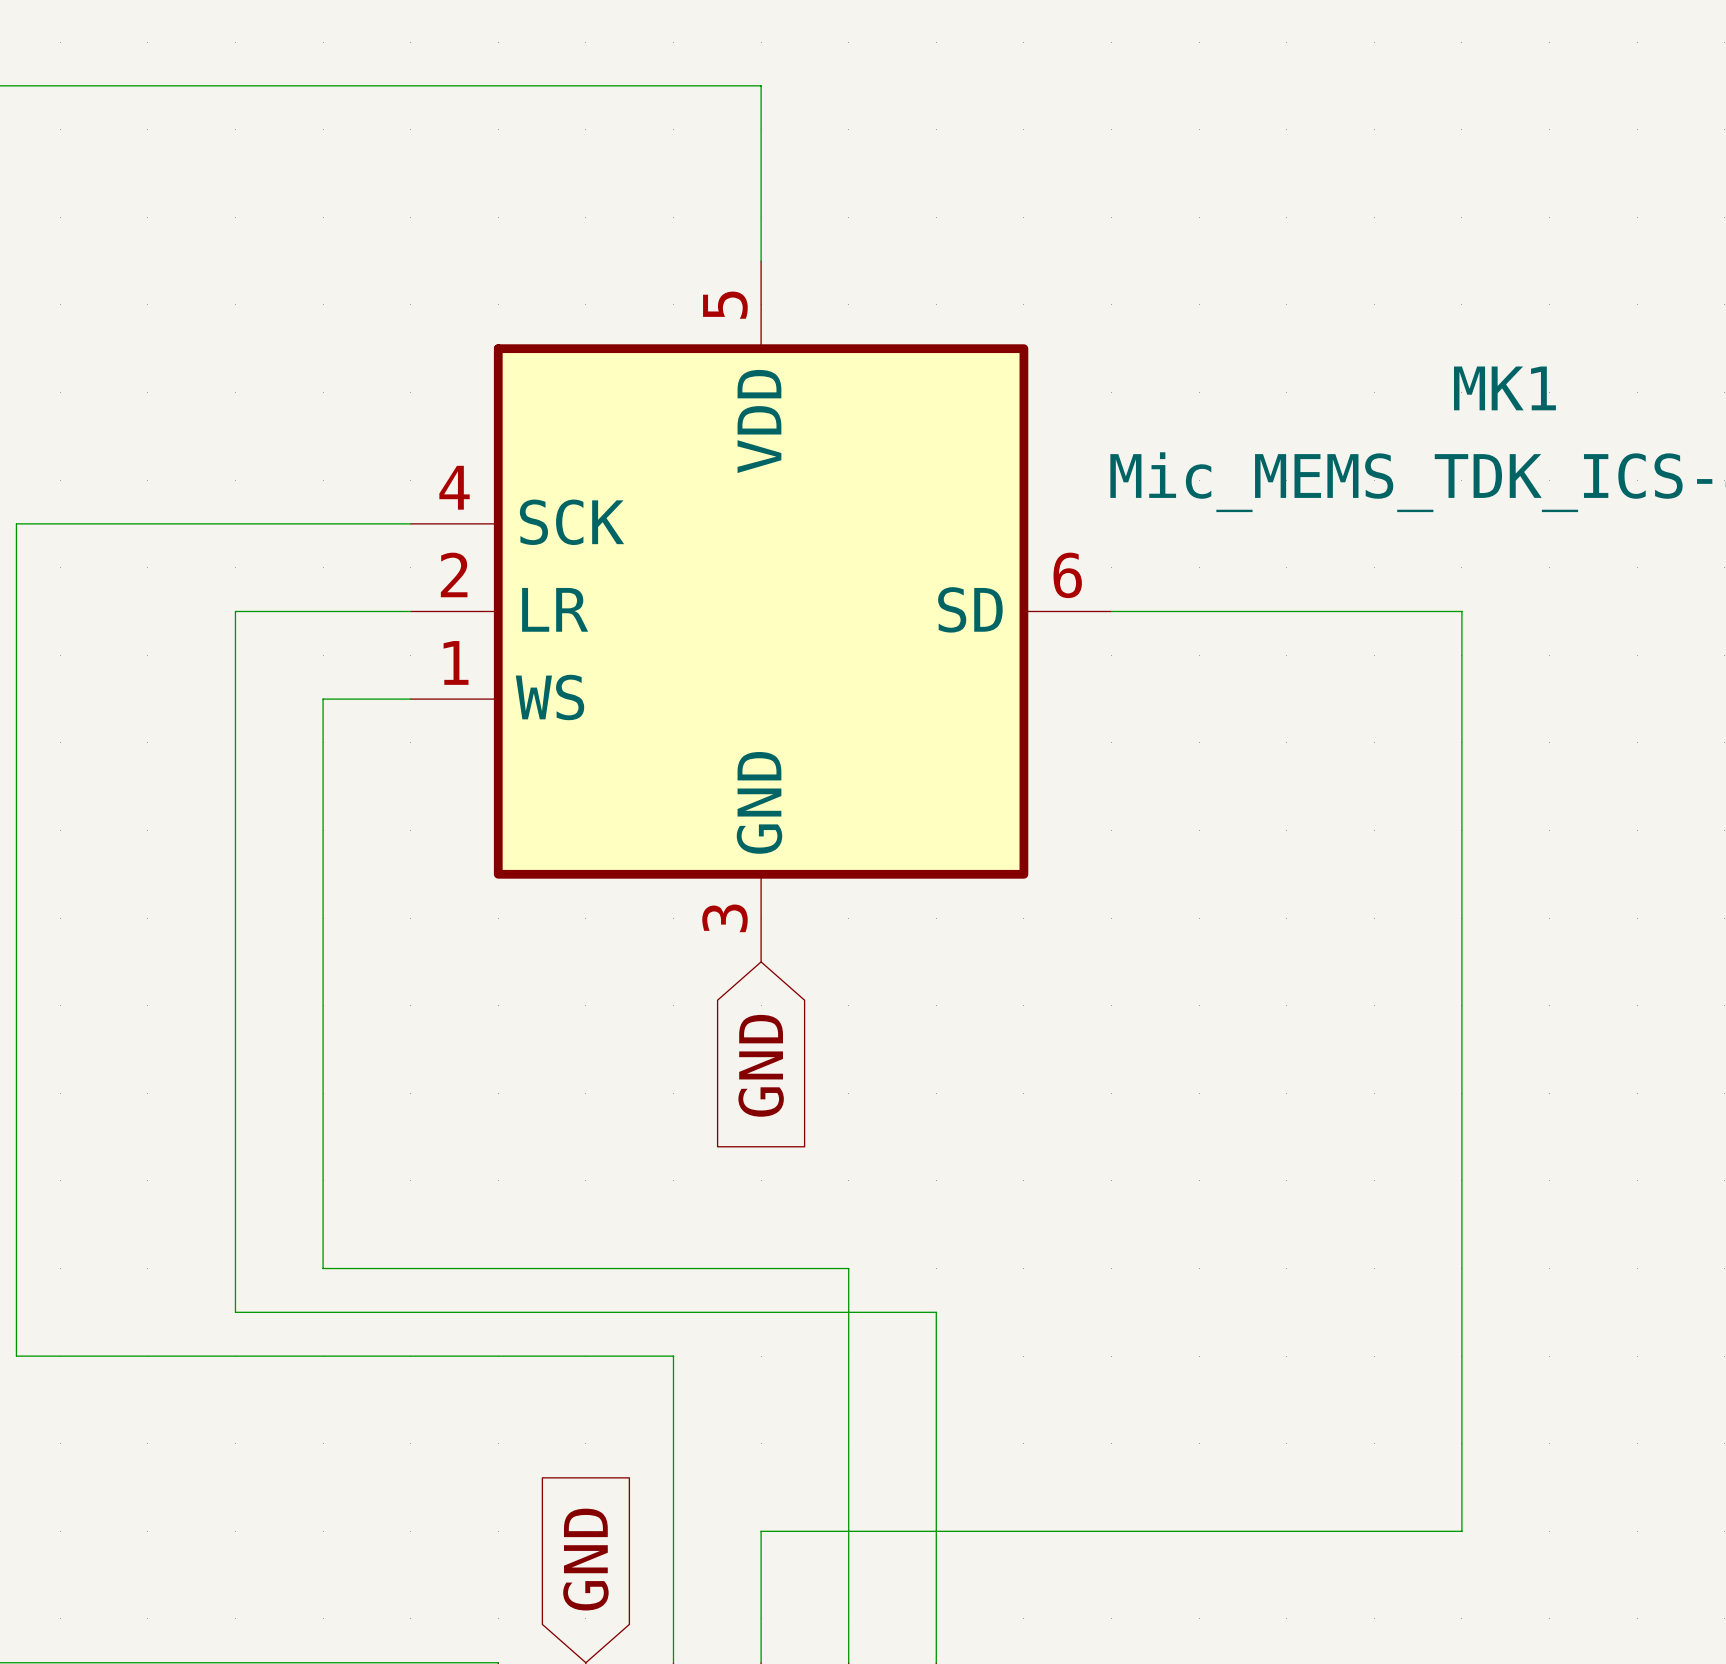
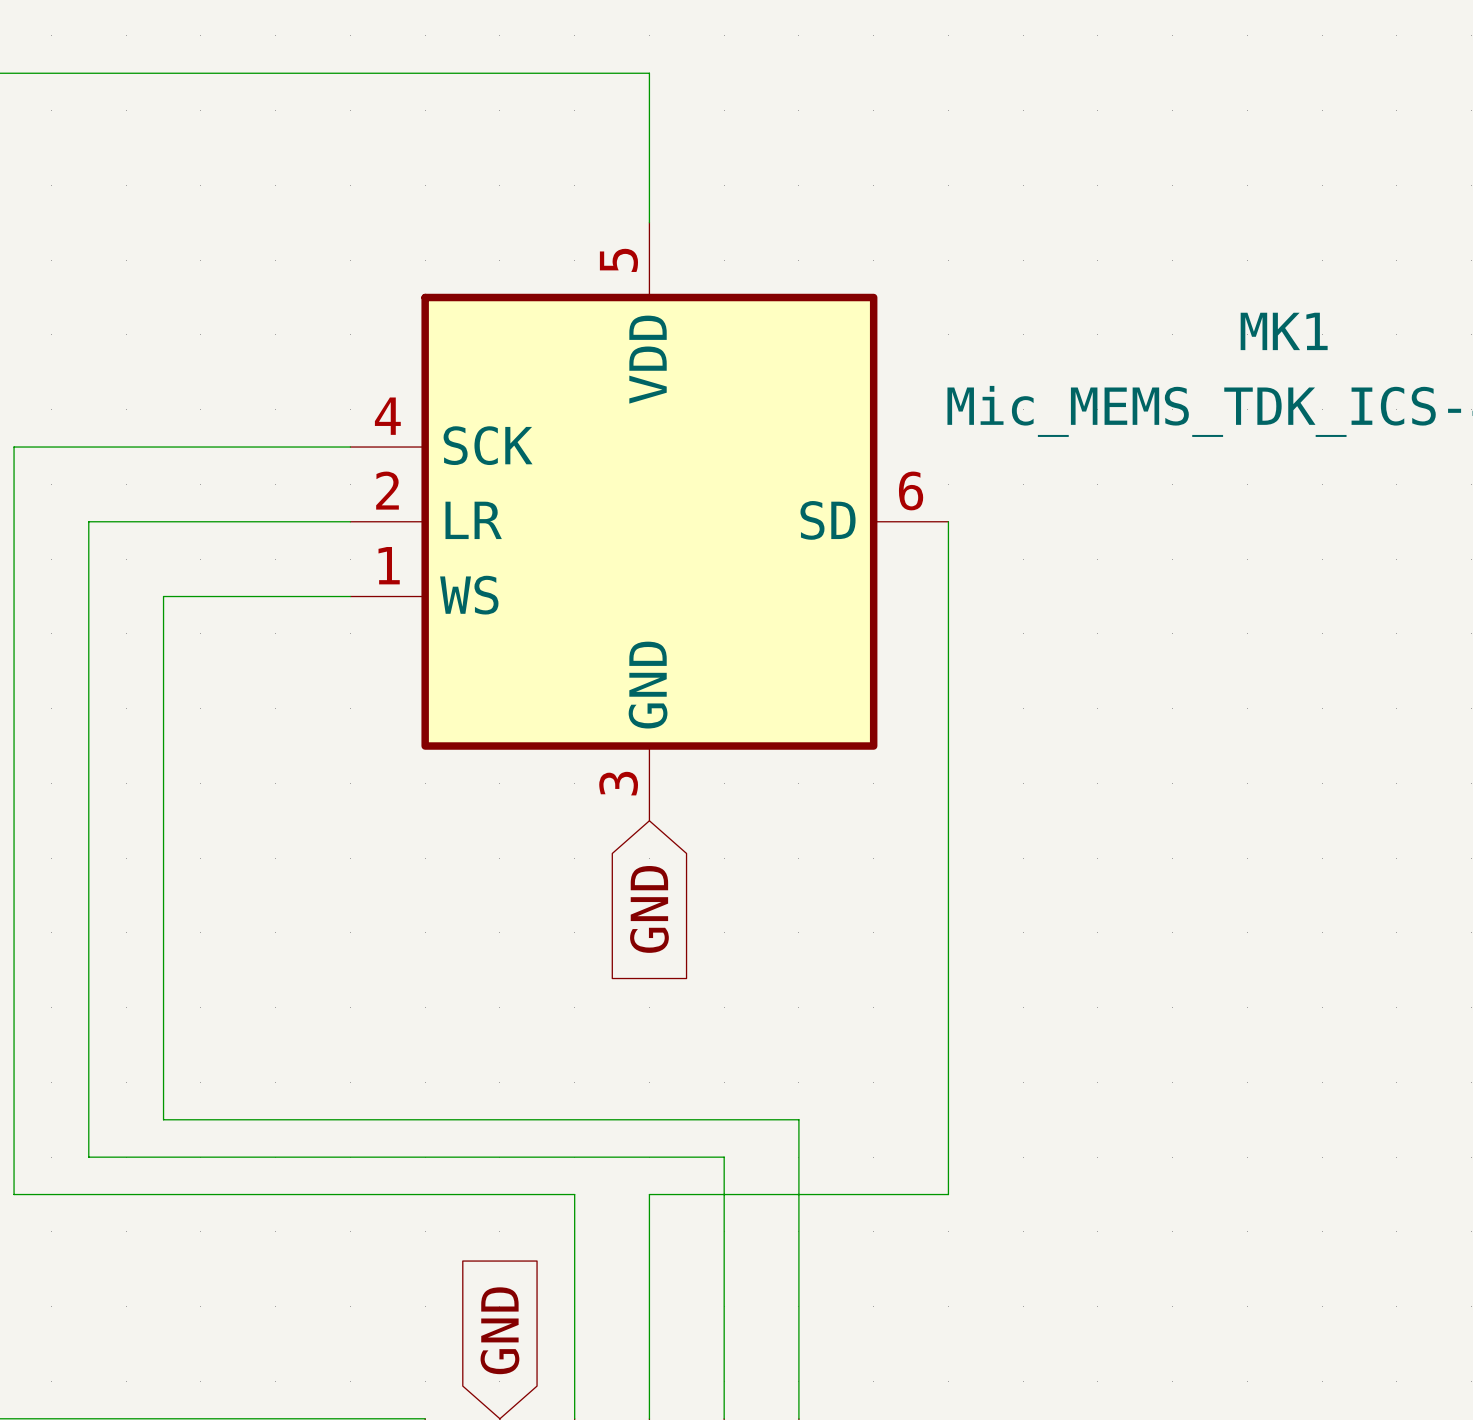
wire: (235, 611) (235, 1312) -> (275, 596) (163, 596) (163, 1119) (200, 1119)
wire: none -> (200, 521) (88, 521) (88, 1157)
wire: (1111, 611) (1461, 611) (1461, 1531) (761, 1531) -> (948, 521) (948, 1194) (649, 1194) (649, 1306)
wire: (323, 699) (323, 1268) (848, 1268) (848, 1356) -> none
wire: (16, 1356) (104, 1356) -> (14, 1157) (14, 1194) (574, 1194)
wire: (673, 1356) (673, 1399) -> (574, 1157) (724, 1157)

